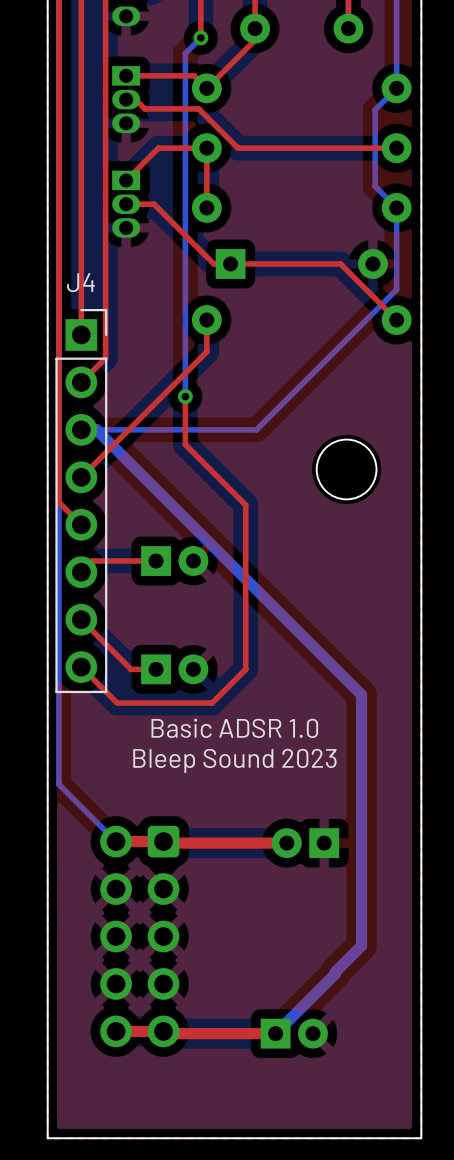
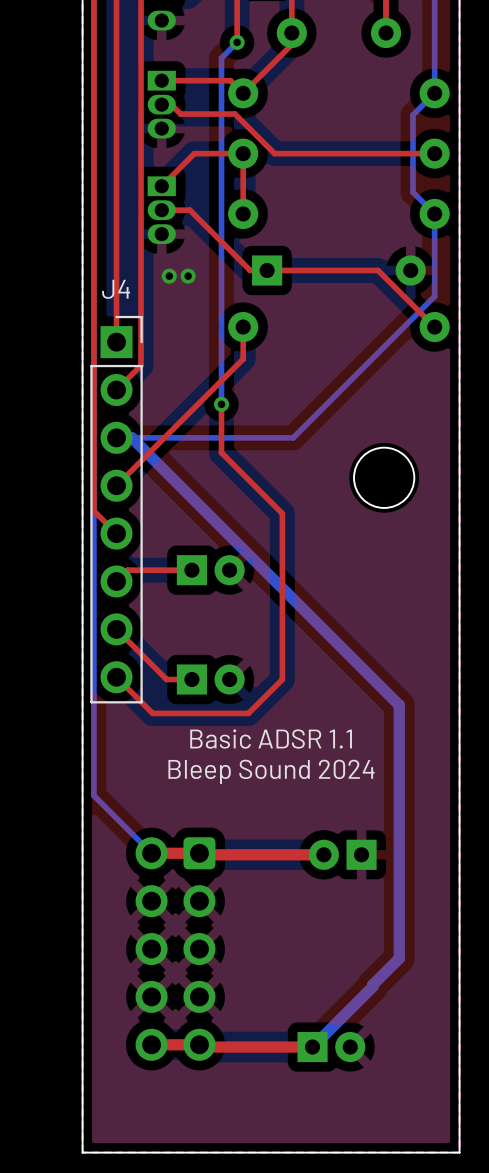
via: none -> (169, 276)
via: none -> (188, 276)
text: Basic ADSR 1.0 (234, 728) -> Basic ADSR 1.1 (271, 738)
text: Bleep Sound 2023 (234, 760) -> Bleep Sound 2024 (271, 771)

